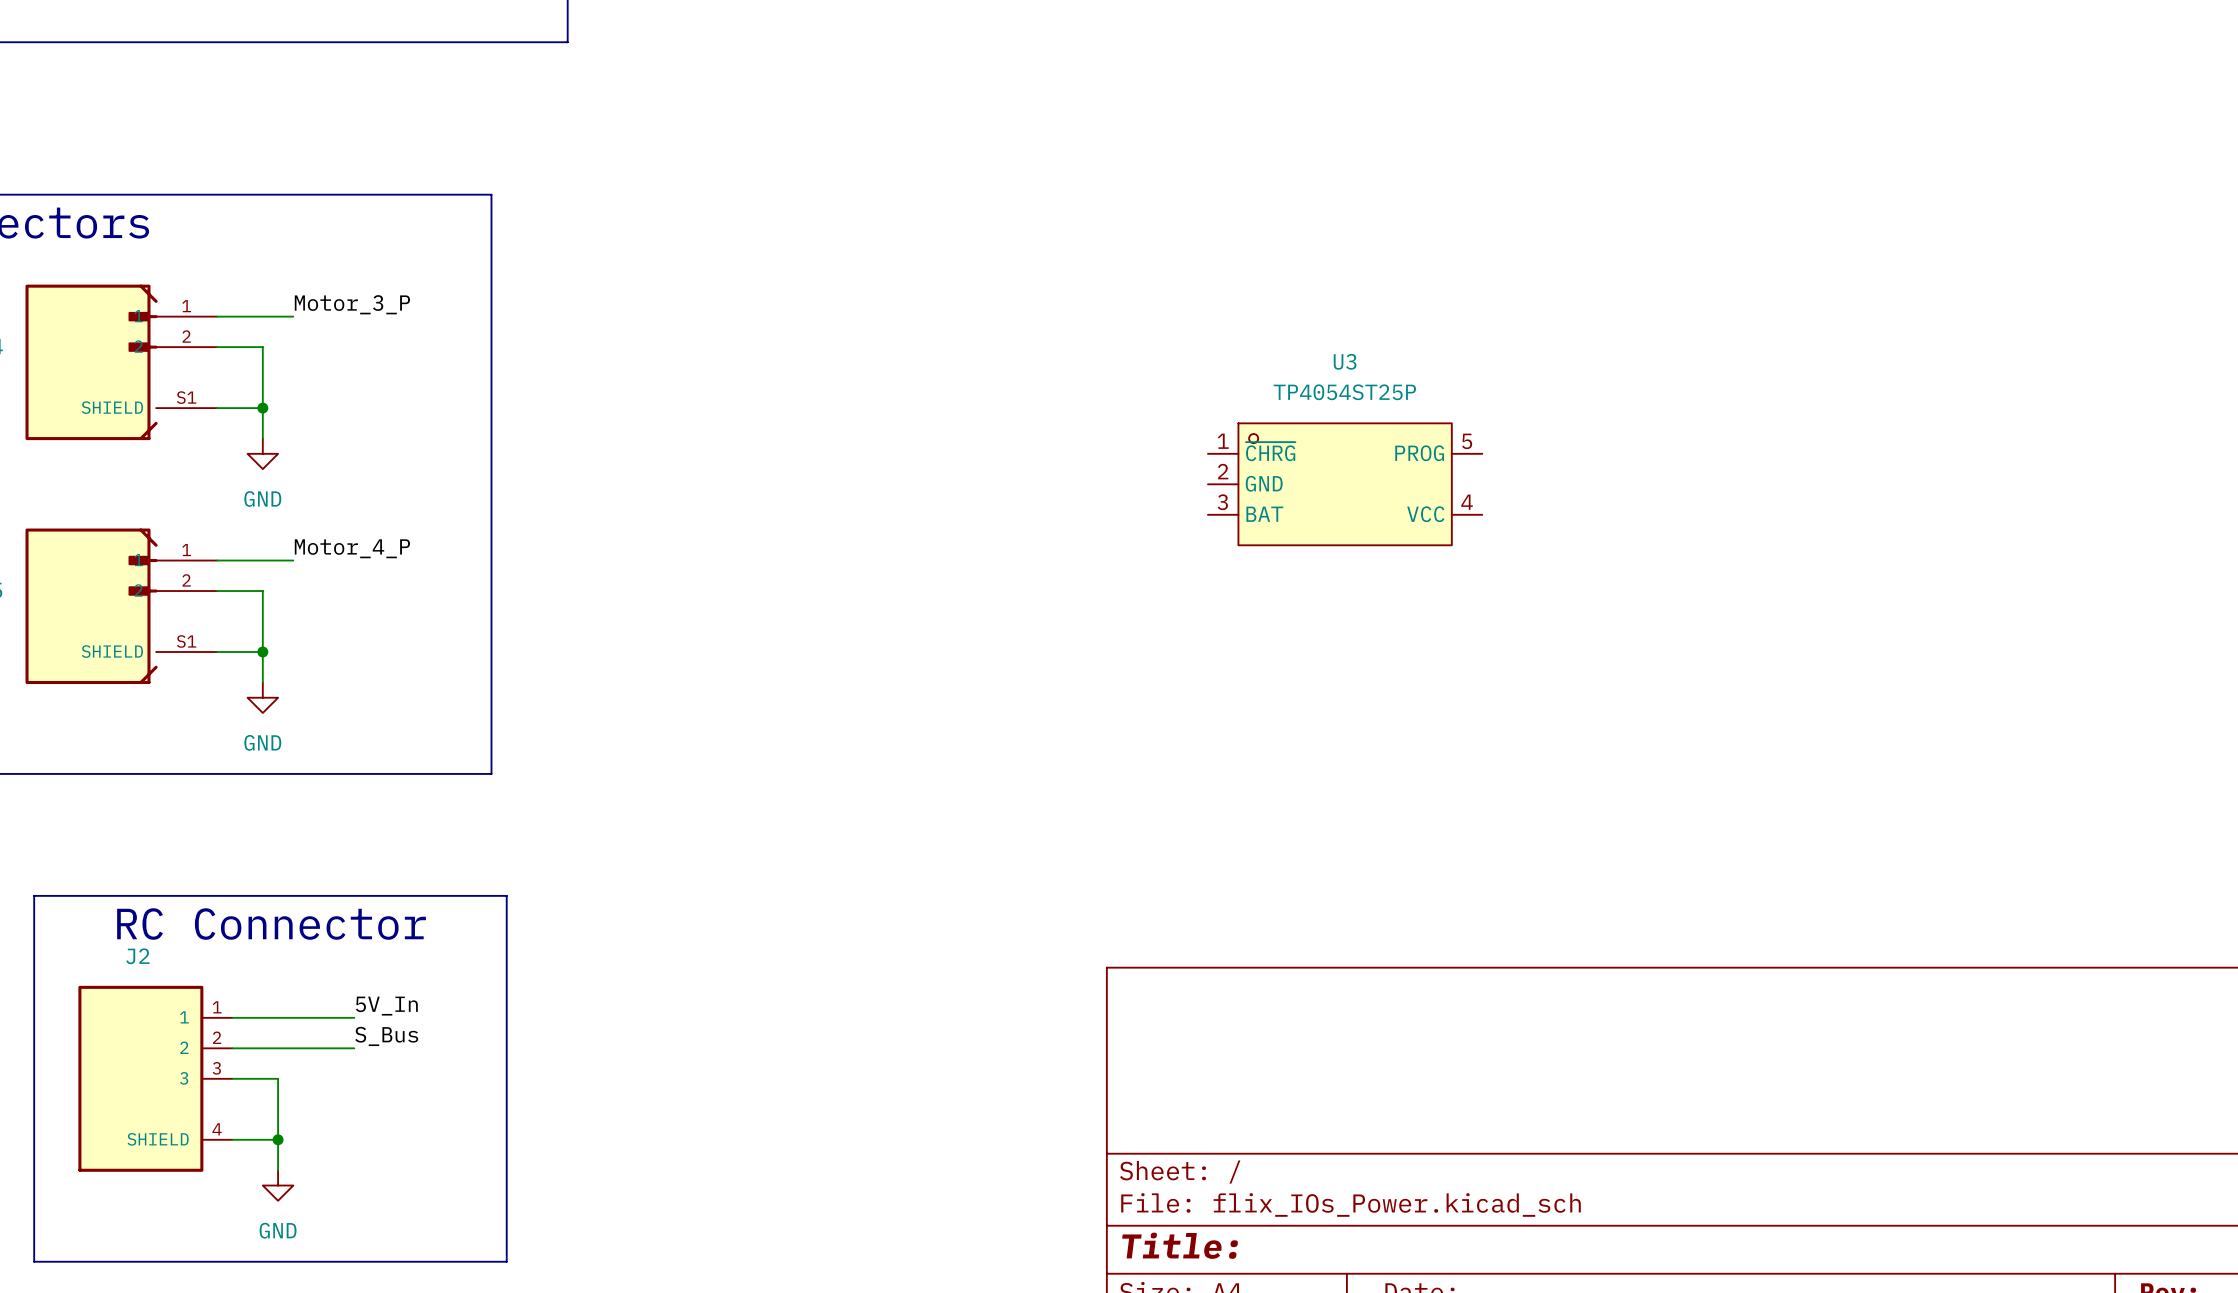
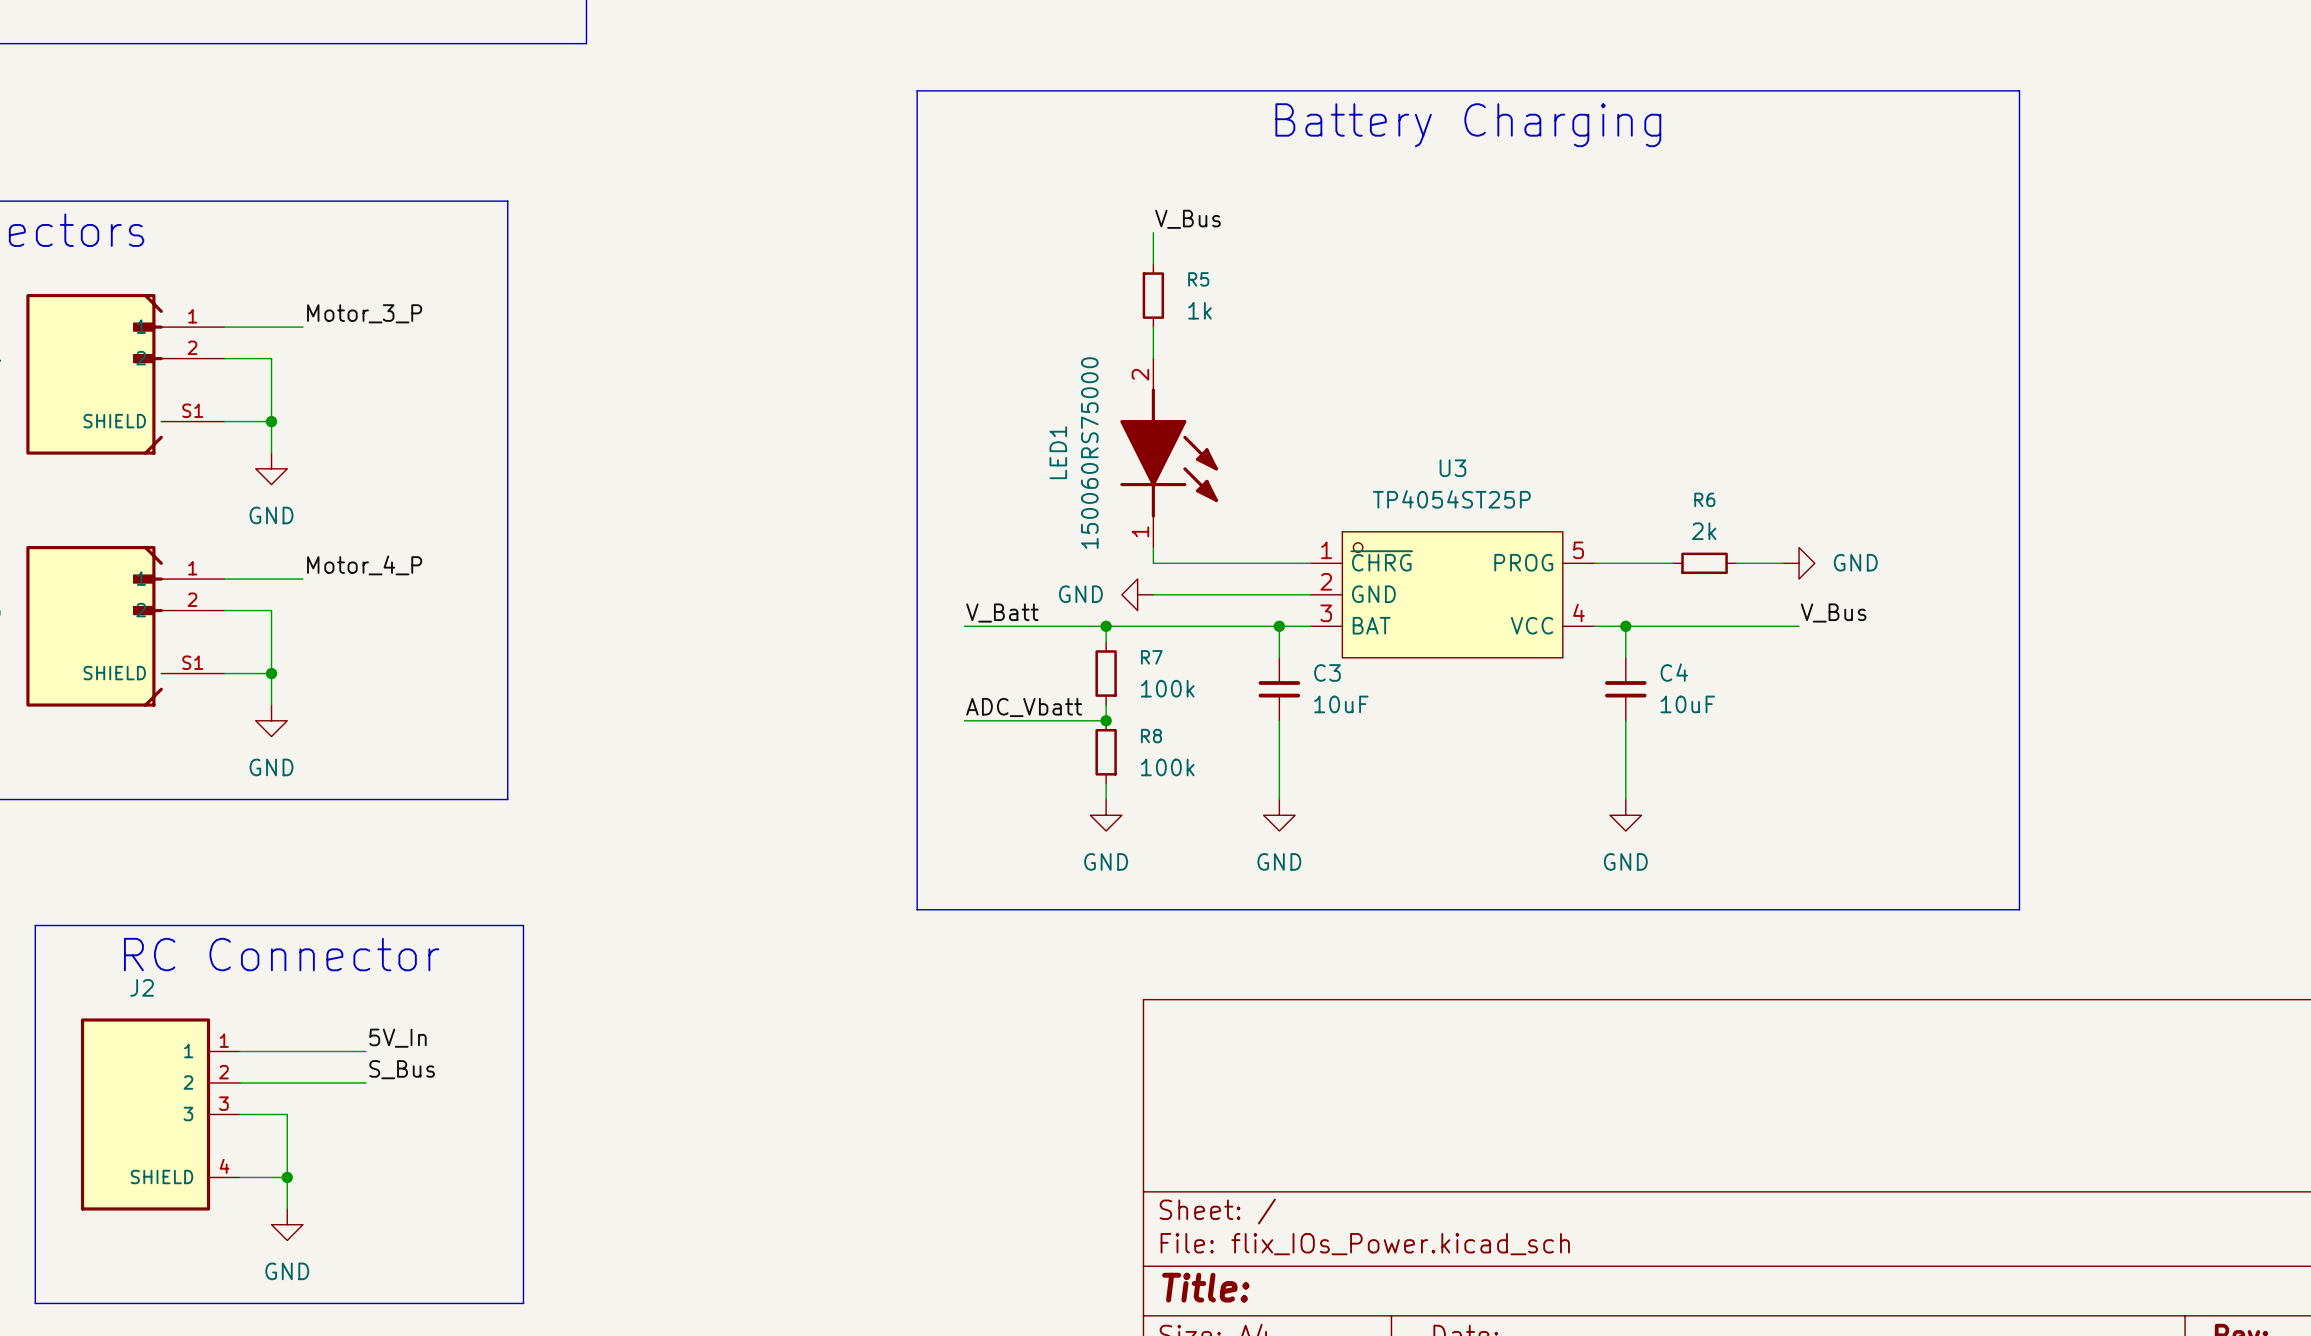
line: none -> (917, 90) (2019, 90) (2019, 909) (917, 909) (917, 90)
text: none -> Battery Charging (1468, 125)
label: none -> V_Bus (1187, 219)
wire: none -> (1153, 232) (1153, 264)
R5: none -> 1k (1153, 295)
wire: none -> (1153, 327) (1153, 358)
LED1: none -> 150060RS75000 (1169, 453)
U3 position: (1345, 484) -> (1452, 594)
wire: none -> (1153, 547) (1153, 563) (1310, 563)
wire: none -> (1594, 563) (1673, 563)
R6: none -> 2k (1704, 563)
wire: none -> (1736, 563) (1783, 563)
power symbol: none -> GND (1799, 563)
power symbol: none -> GND (1137, 594)
wire: none -> (1153, 594) (1310, 594)
label: none -> V_Batt (1002, 613)
label: none -> V_Bus (1833, 613)
wire: none -> (964, 626) (1310, 626)
wire: none -> (1106, 626) (1106, 642)
junction: none -> (1106, 626)
wire: none -> (1279, 626) (1279, 657)
junction: none -> (1279, 626)
wire: none -> (1594, 626) (1799, 626)
wire: none -> (1625, 626) (1625, 657)
junction: none -> (1625, 626)
R7: none -> 100k (1106, 673)
C3: none -> 10uF (1279, 689)
C4: none -> 10uF (1625, 689)
wire: none -> (1106, 705) (1106, 720) (964, 720)
label: none -> ADC_Vbatt (1024, 707)
junction: none -> (1106, 720)
wire: none -> (1279, 720) (1279, 799)
wire: none -> (1625, 720) (1625, 799)
R8: none -> 100k (1106, 752)
wire: none -> (1106, 783) (1106, 799)
power symbol: none -> GND (1106, 815)
power symbol: none -> GND (1279, 815)
power symbol: none -> GND (1625, 815)

